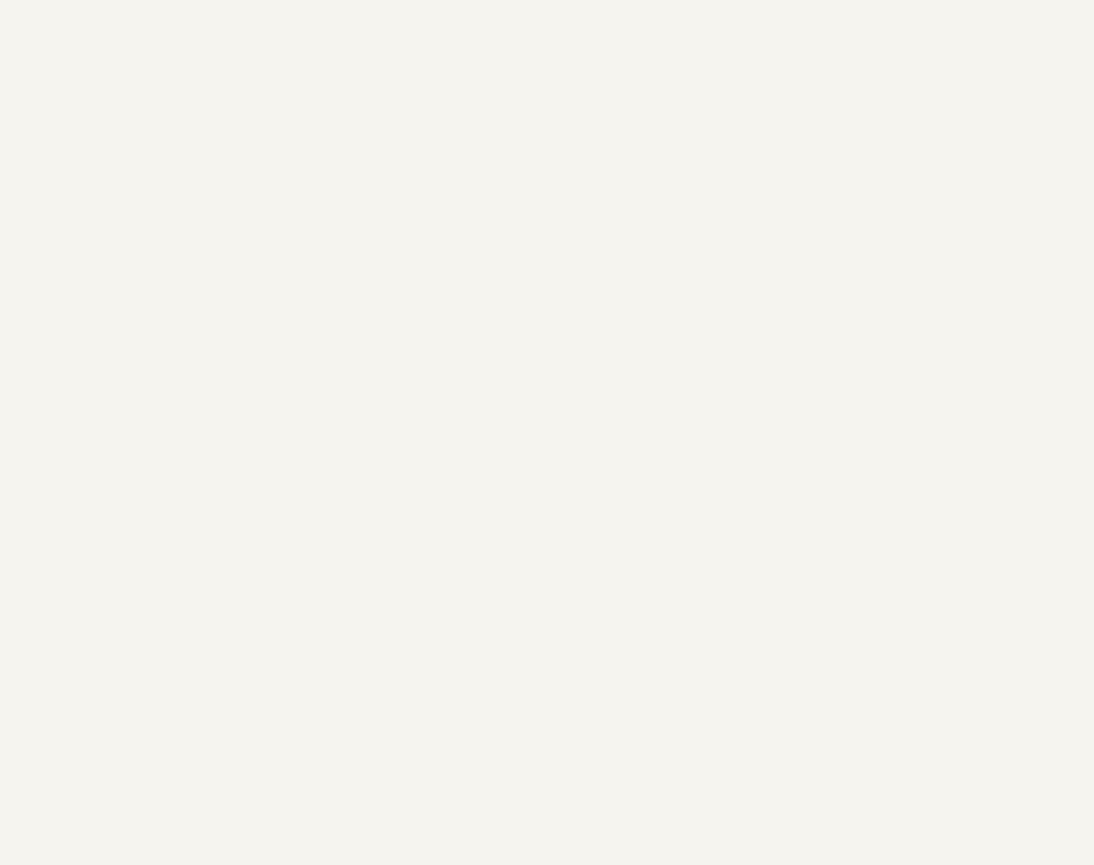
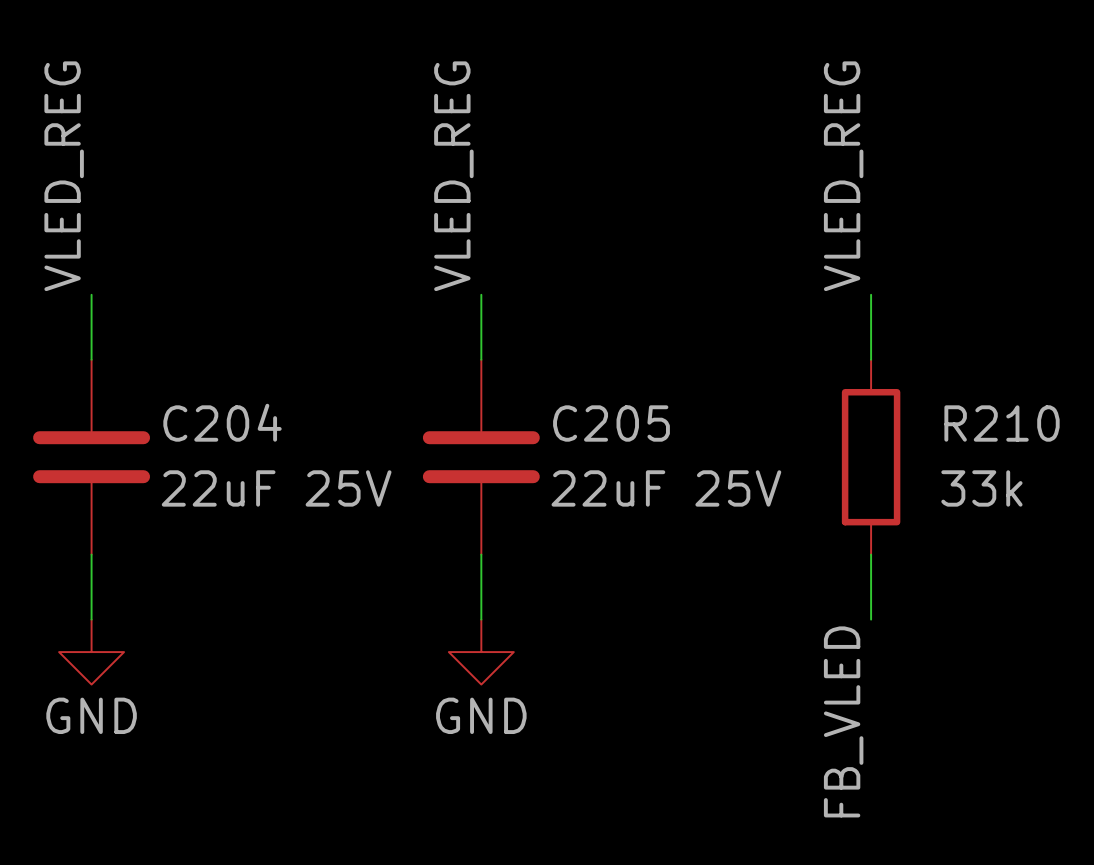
label: none -> VLED_REG (64, 176)
label: none -> VLED_REG (453, 176)
label: none -> VLED_REG (843, 176)
wire: none -> (91, 294) (91, 359)
wire: none -> (481, 294) (481, 359)
wire: none -> (871, 294) (871, 359)
C204: none -> 22uF 25V (91, 457)
C205: none -> 22uF 25V (481, 457)
R210: none -> 33k (871, 457)
wire: none -> (91, 554) (91, 619)
wire: none -> (481, 554) (481, 619)
wire: none -> (871, 554) (871, 619)
power symbol: none -> GND (91, 652)
power symbol: none -> GND (481, 652)
label: none -> FB_VLED (843, 721)

